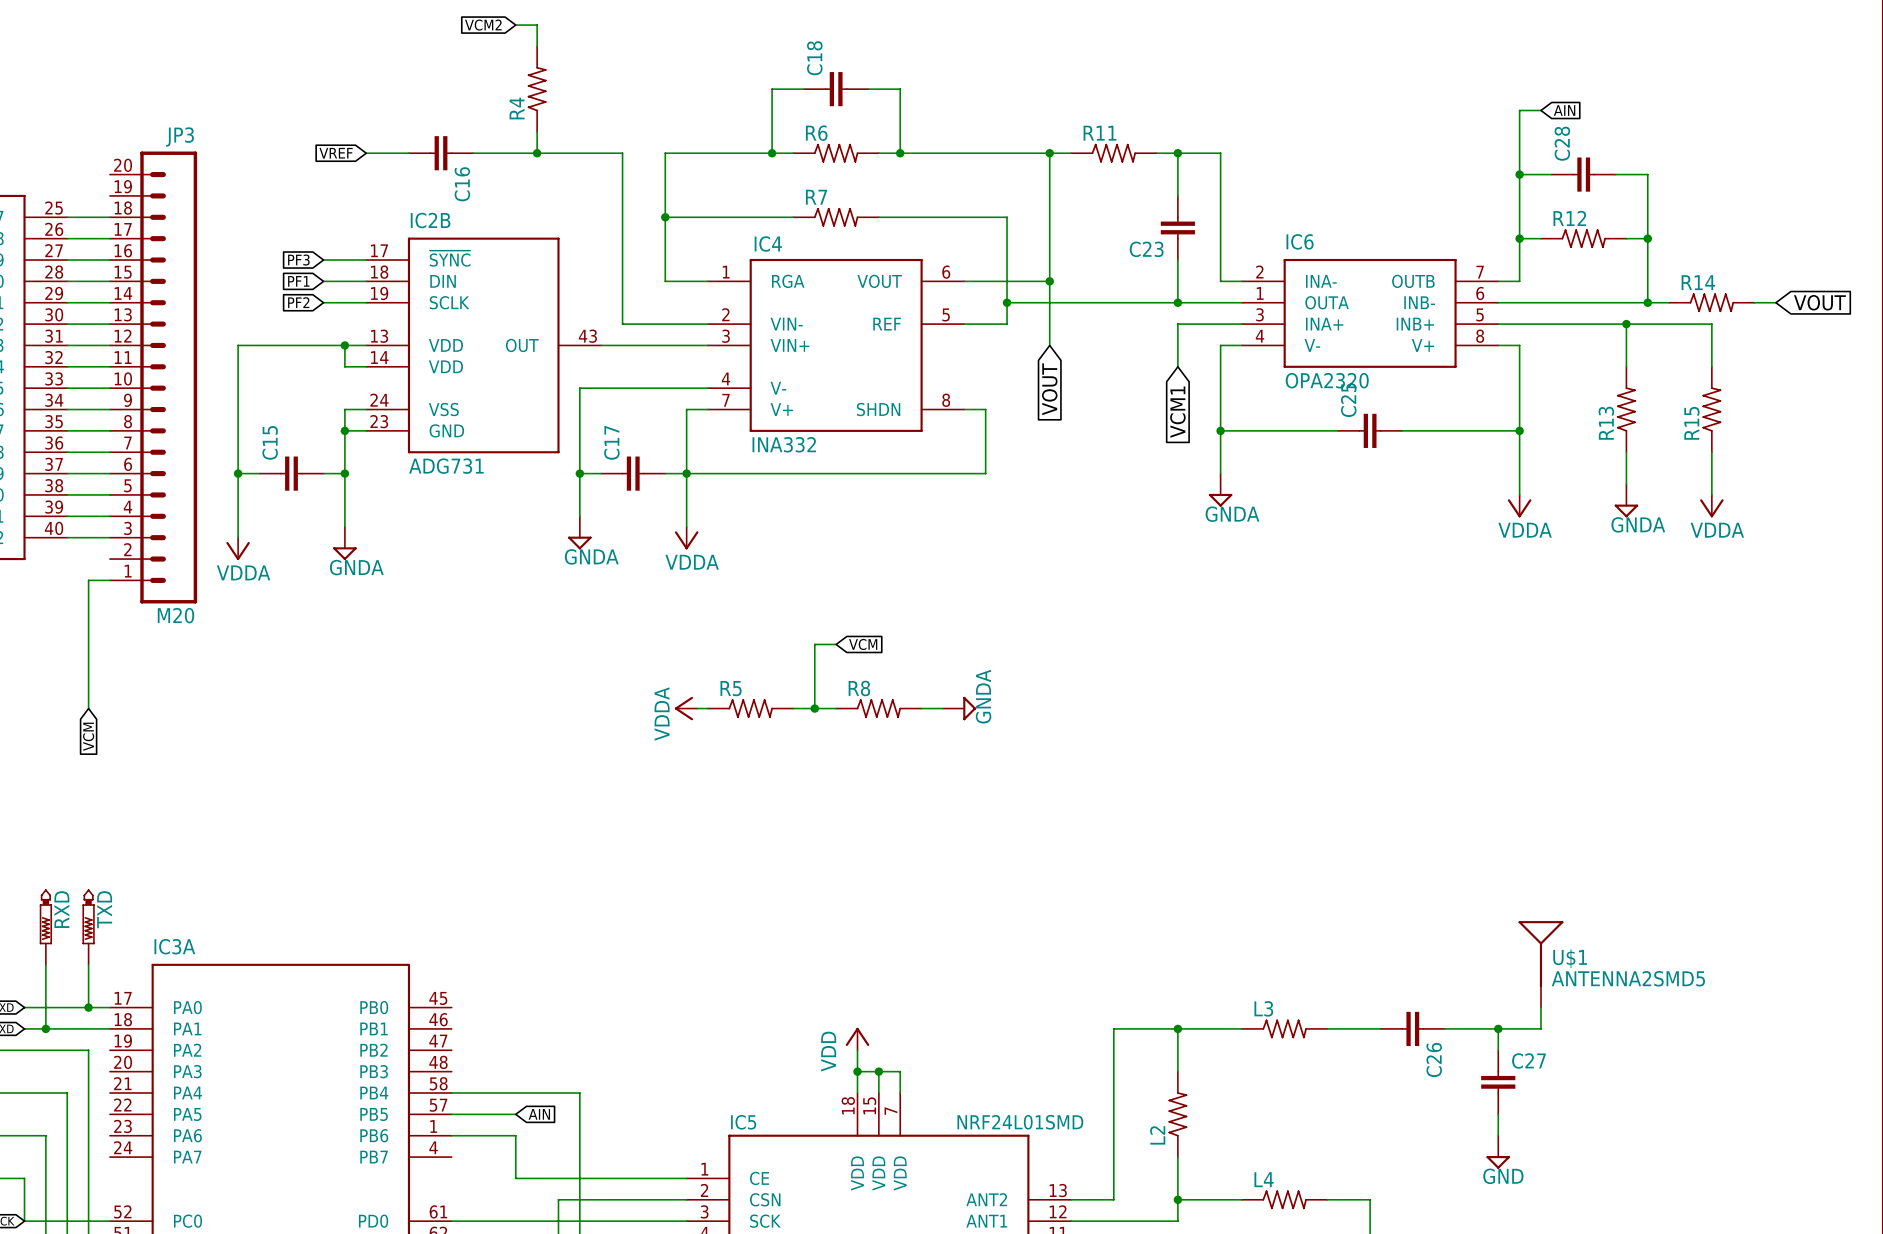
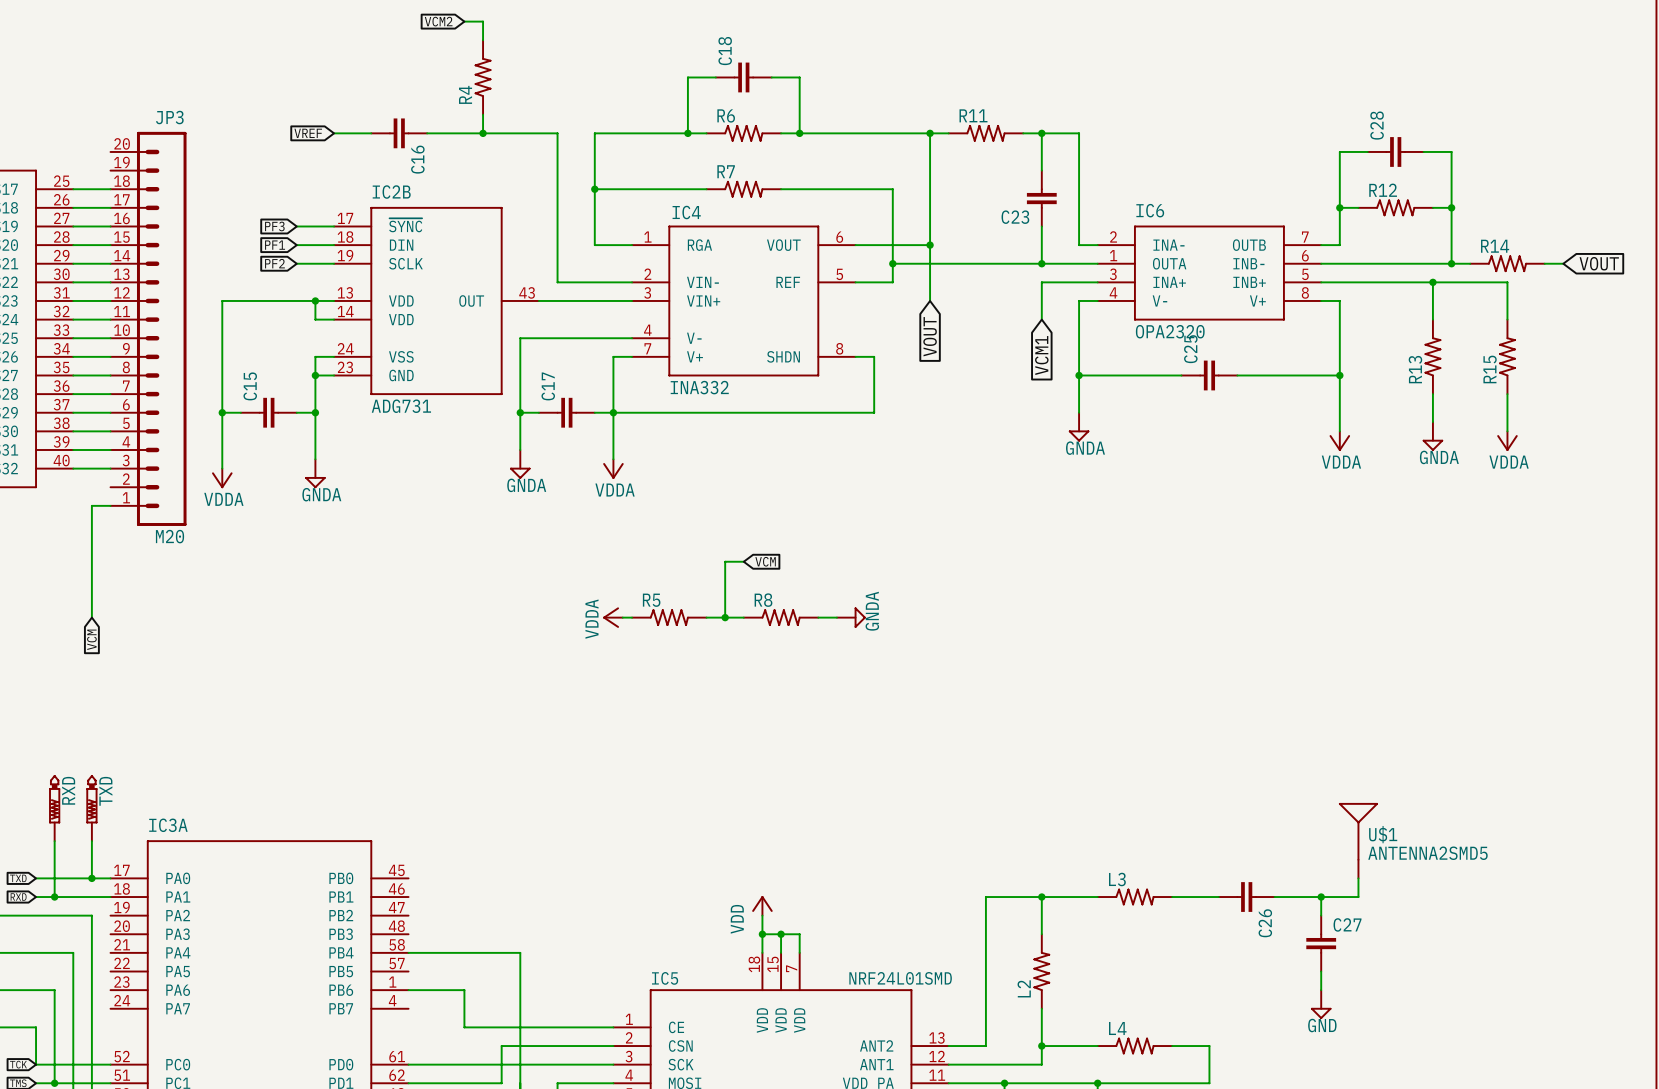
wire: (1540, 110) (1519, 110) (1519, 174) -> none
global label: AIN (1564, 110) -> none
junction: (1519, 174) -> none
wire: (451, 1114) (515, 1114) -> none
global label: AIN (539, 1114) -> none

